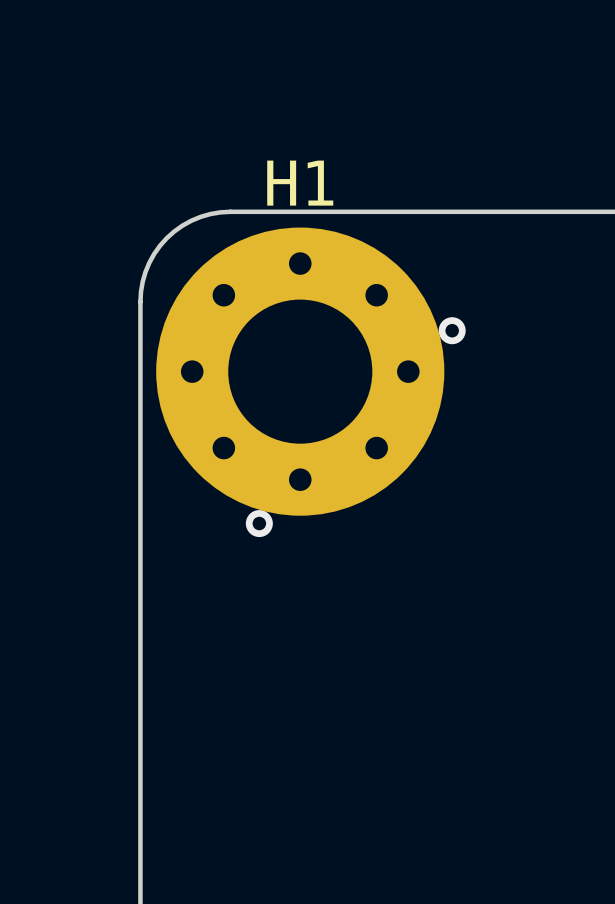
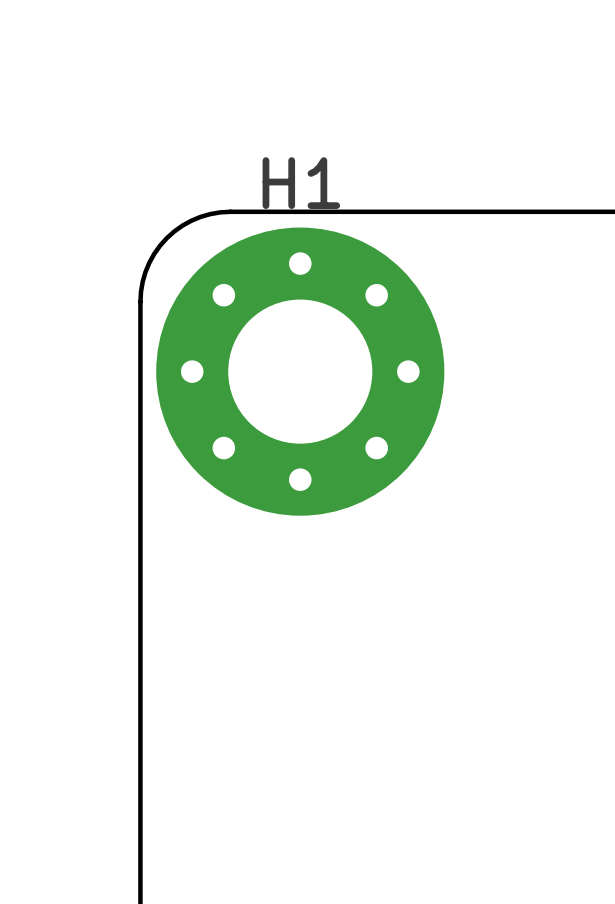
via: (452, 330) -> none
via: (259, 523) -> none

